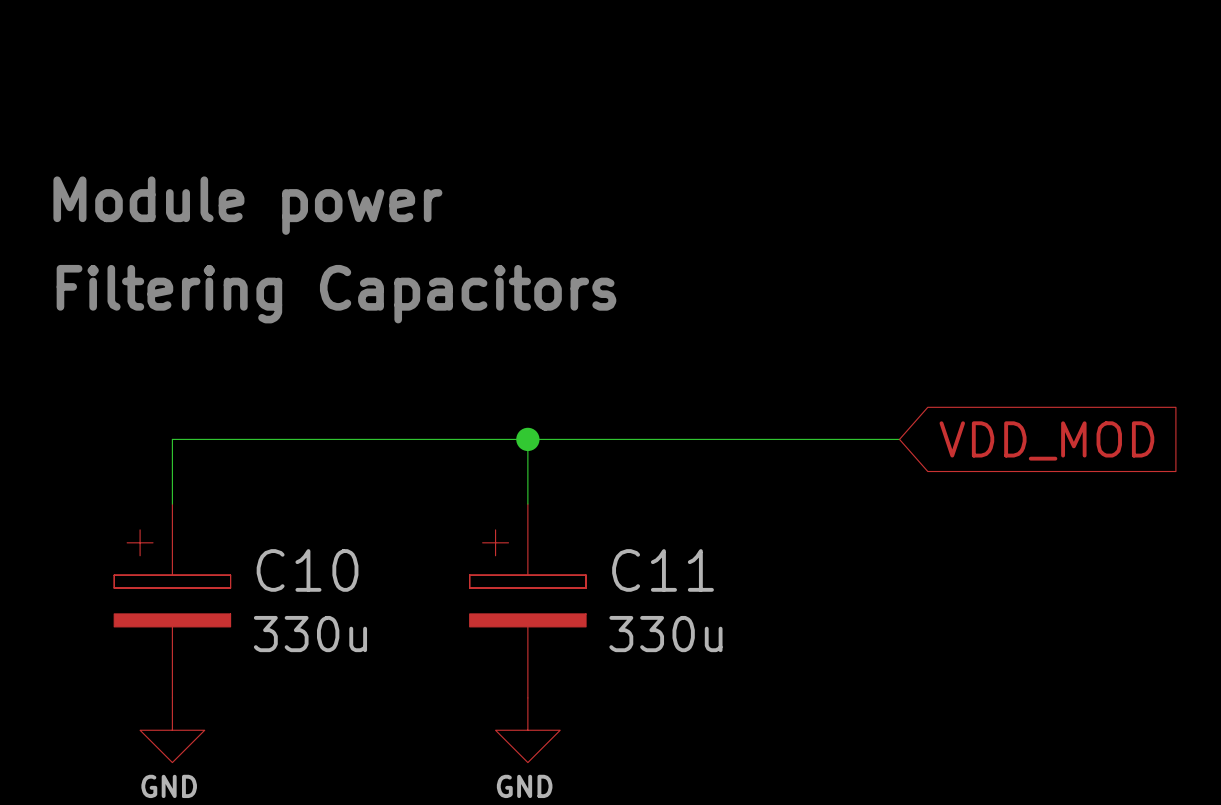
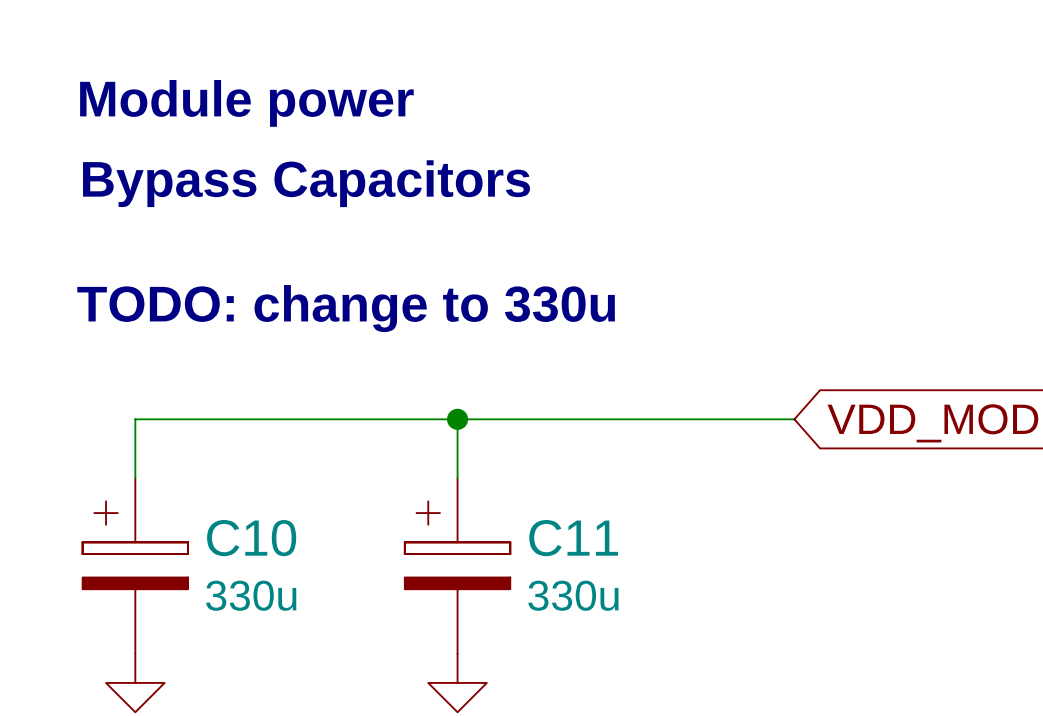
text: none -> Bypass Capacitors (306, 183)
text position: Module power (247, 205) -> Module power (246, 103)
text: Filtering Capacitors (336, 294) -> none
text: none -> TODO: change to 330u (346, 308)

